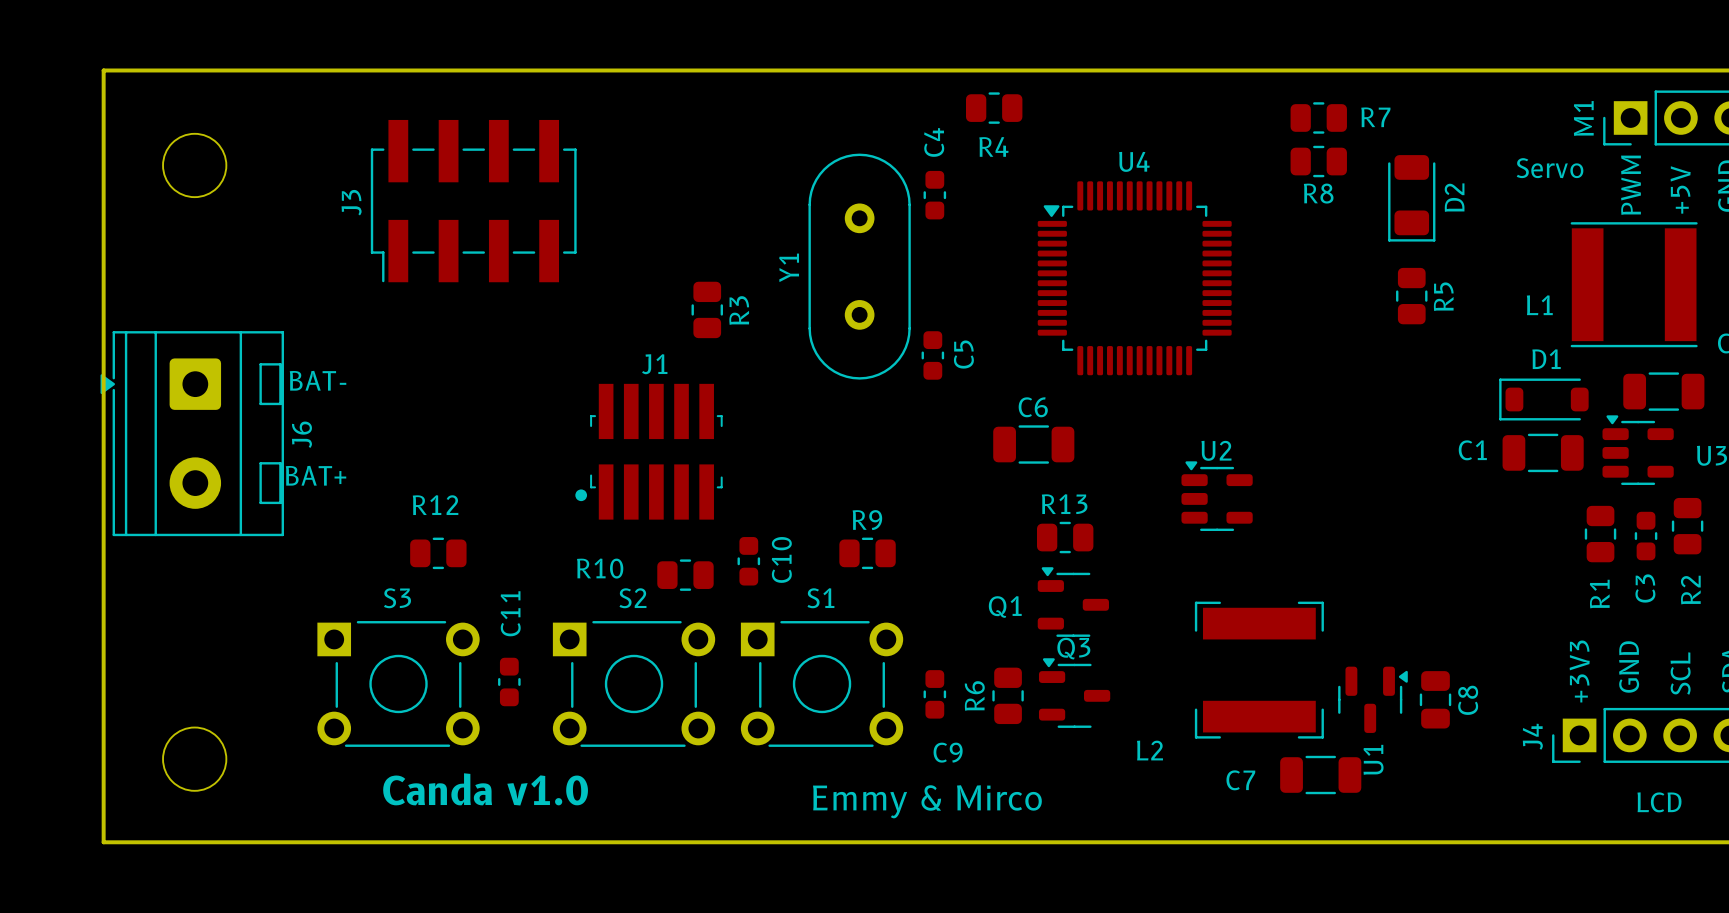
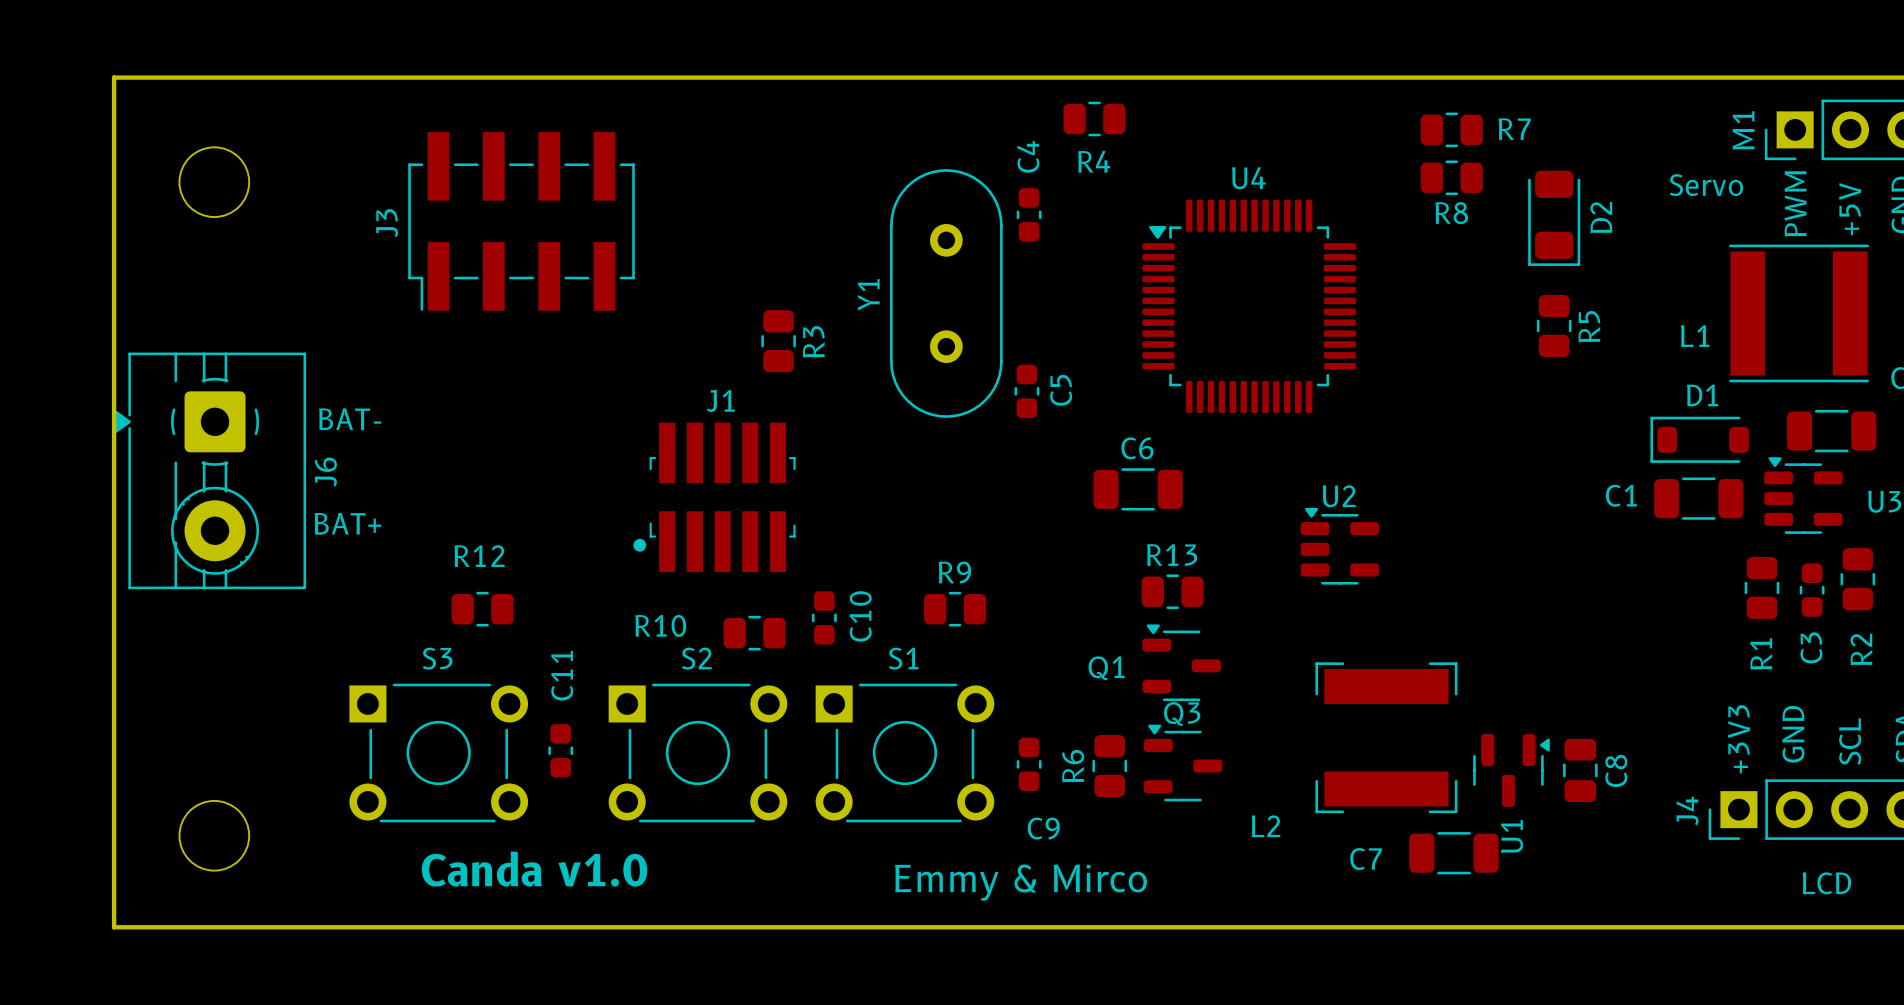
J6 footprint: [100, 331, 284, 537] -> [115, 352, 307, 590]

